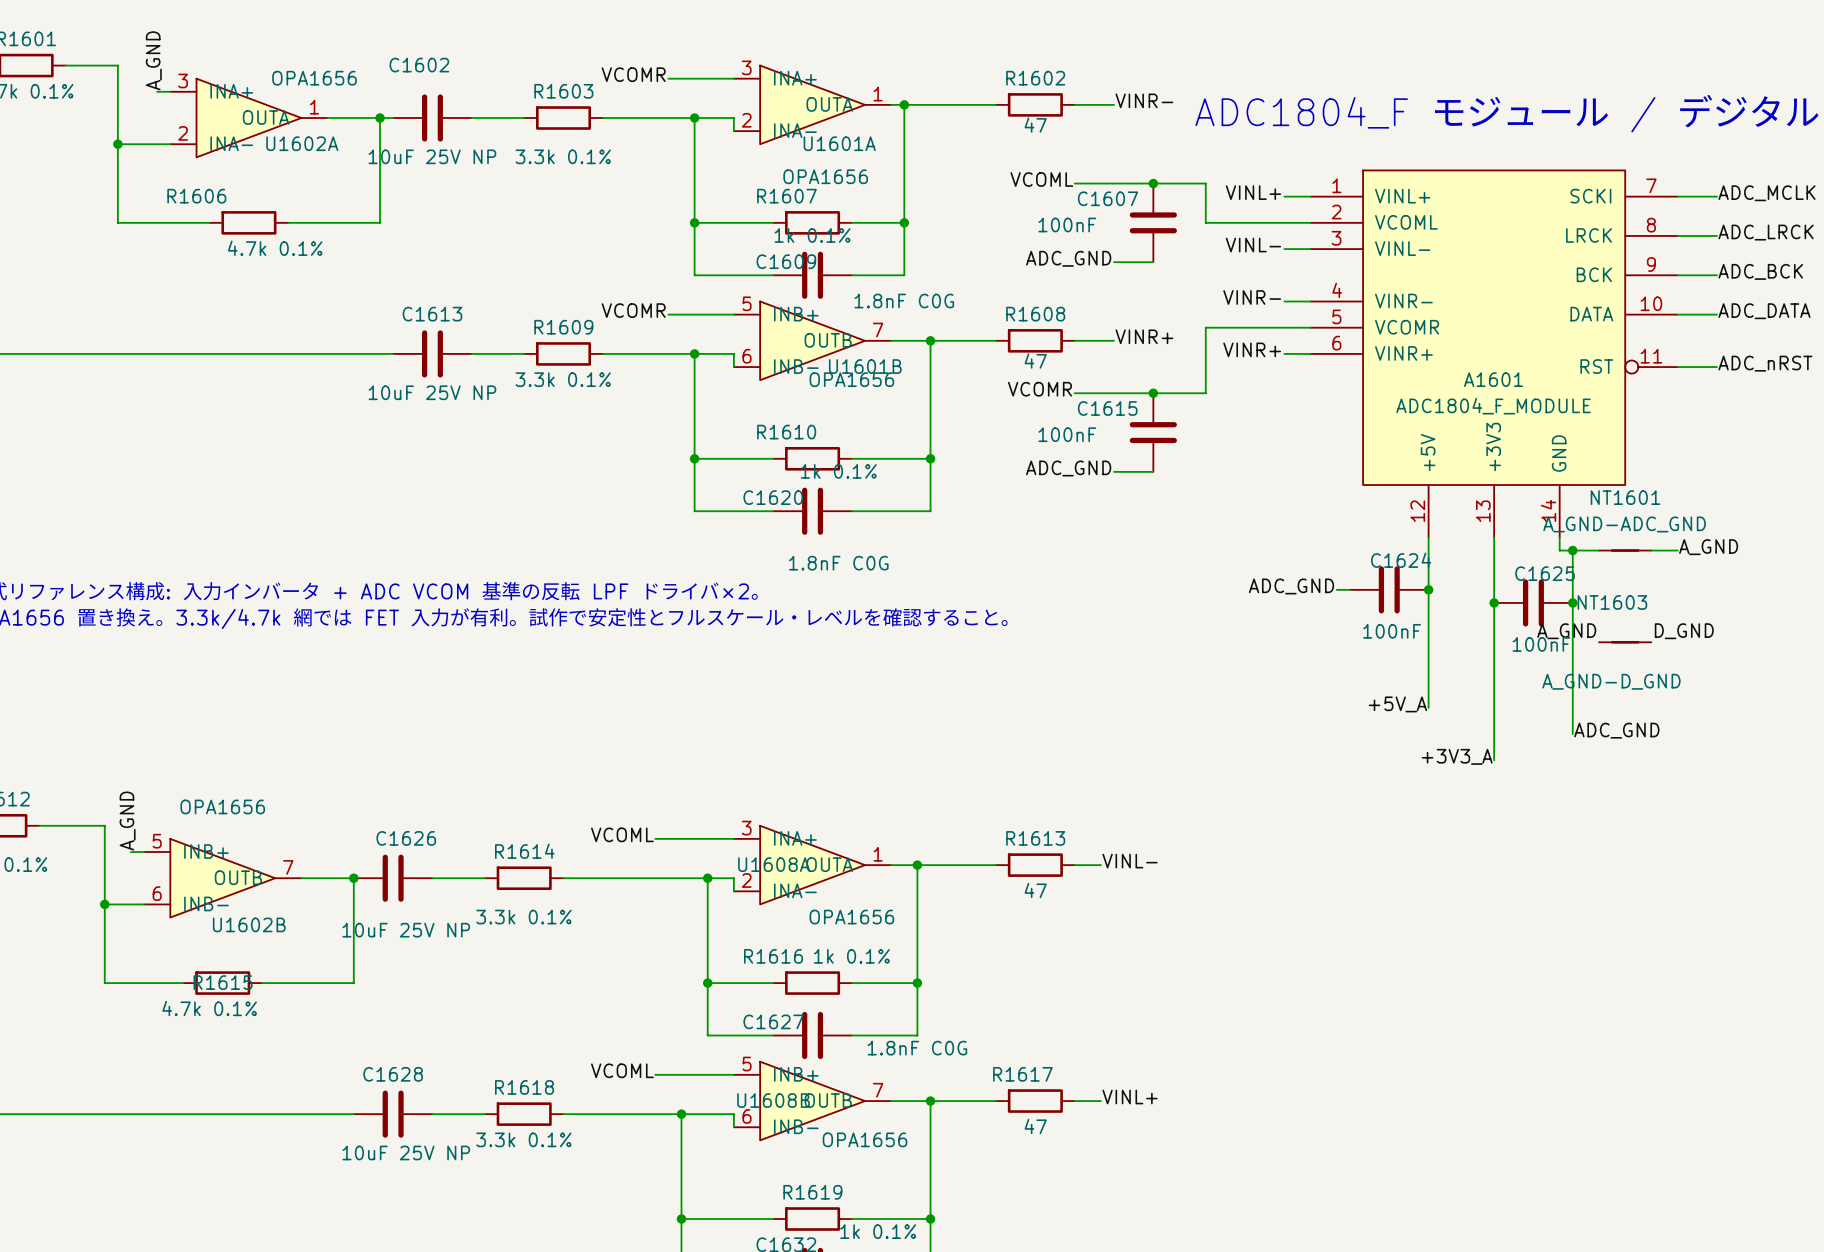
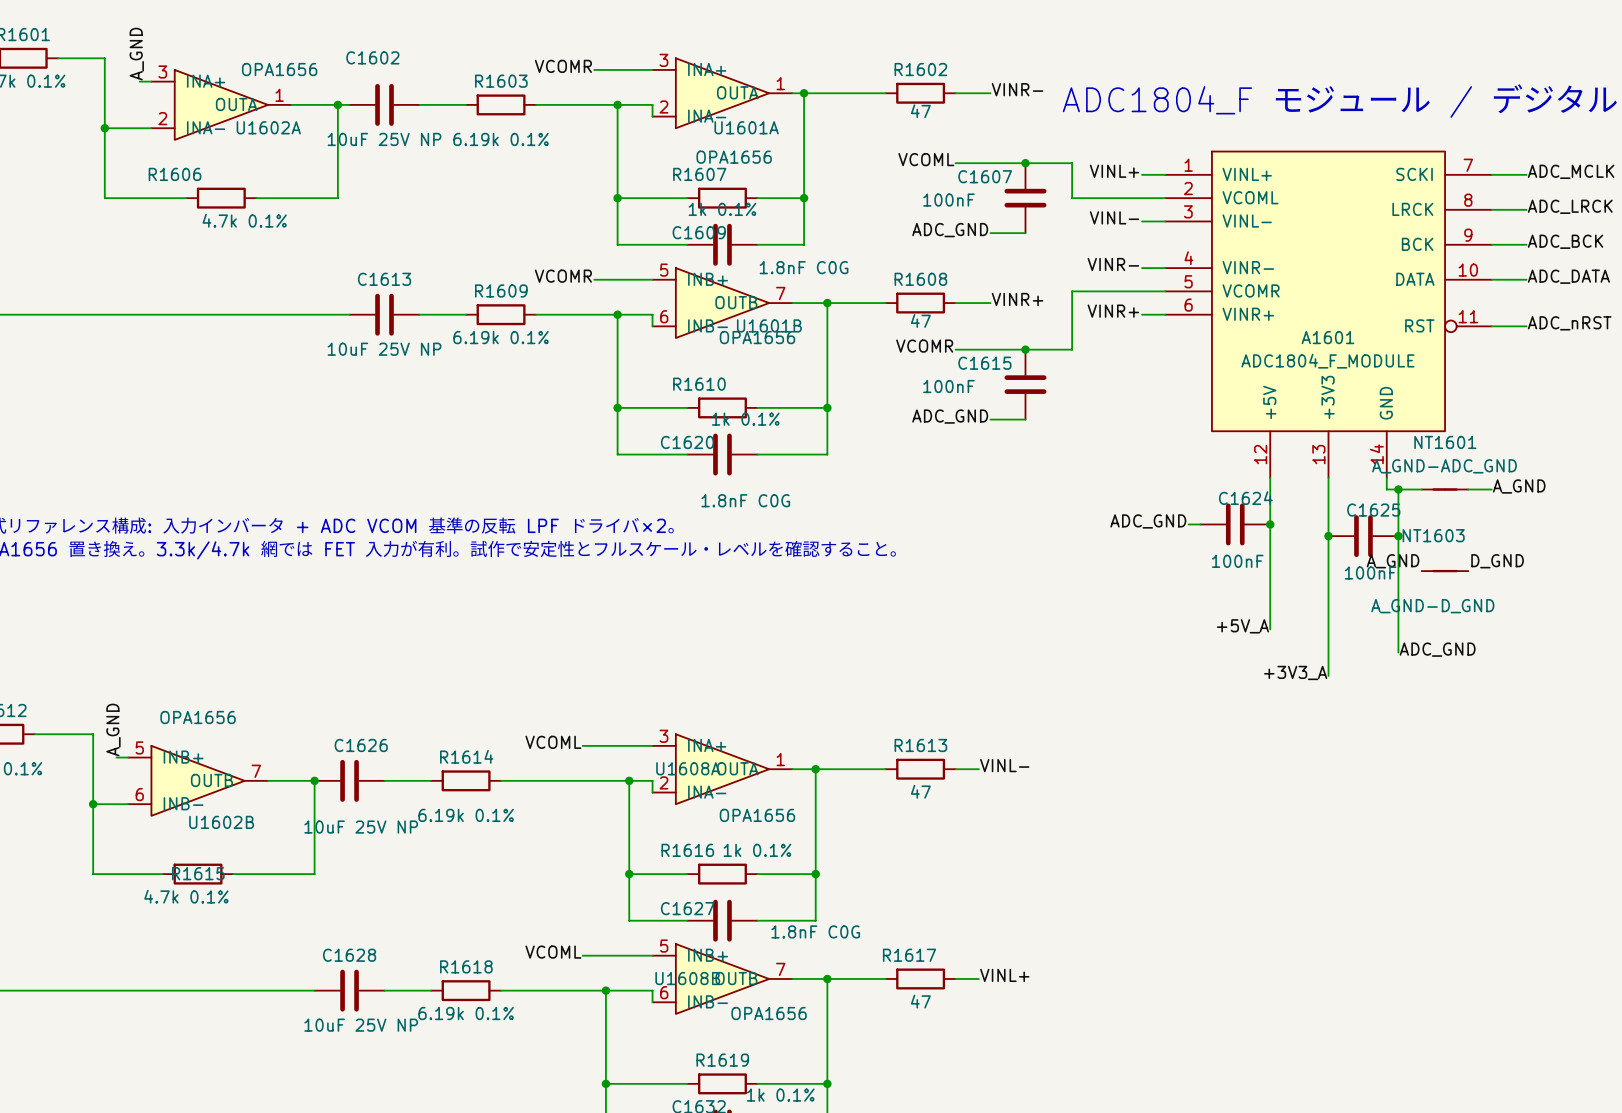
R1603 value: 3.3k 0.1% (563, 156) -> 6.19k 0.1% (501, 139)
R1609 value: 3.3k 0.1% (563, 379) -> 6.19k 0.1% (501, 337)
R1614 value: 3.3k 0.1% (523, 917) -> 6.19k 0.1% (466, 815)
R1618 value: 3.3k 0.1% (523, 1139) -> 6.19k 0.1% (466, 1013)

